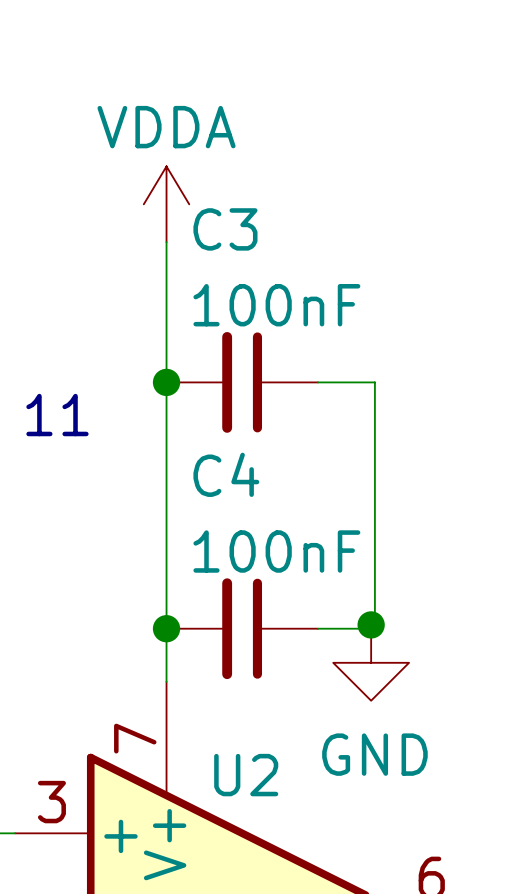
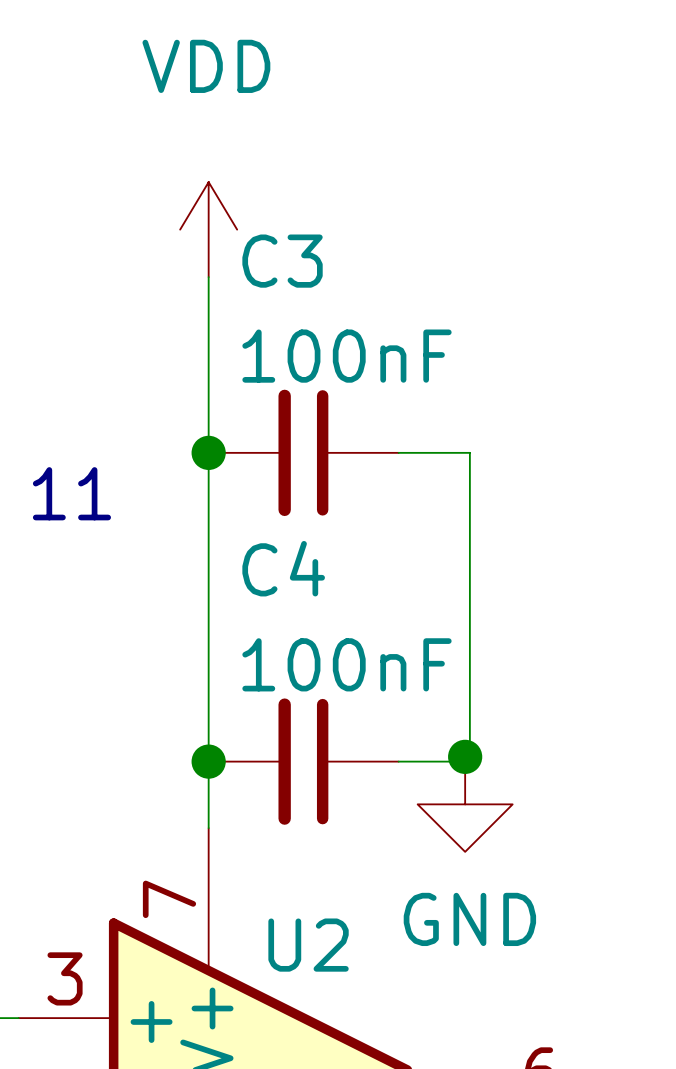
power symbol: VDDA (166, 204) -> VDD (208, 229)

